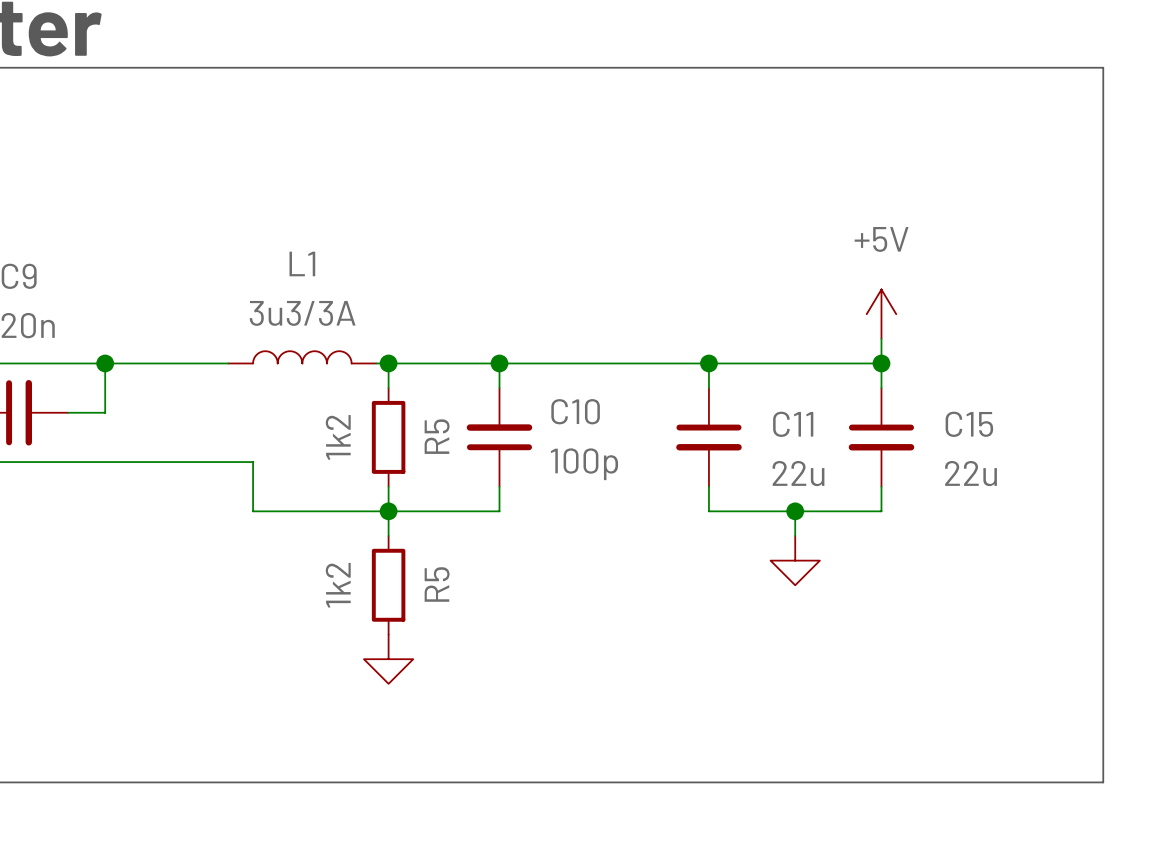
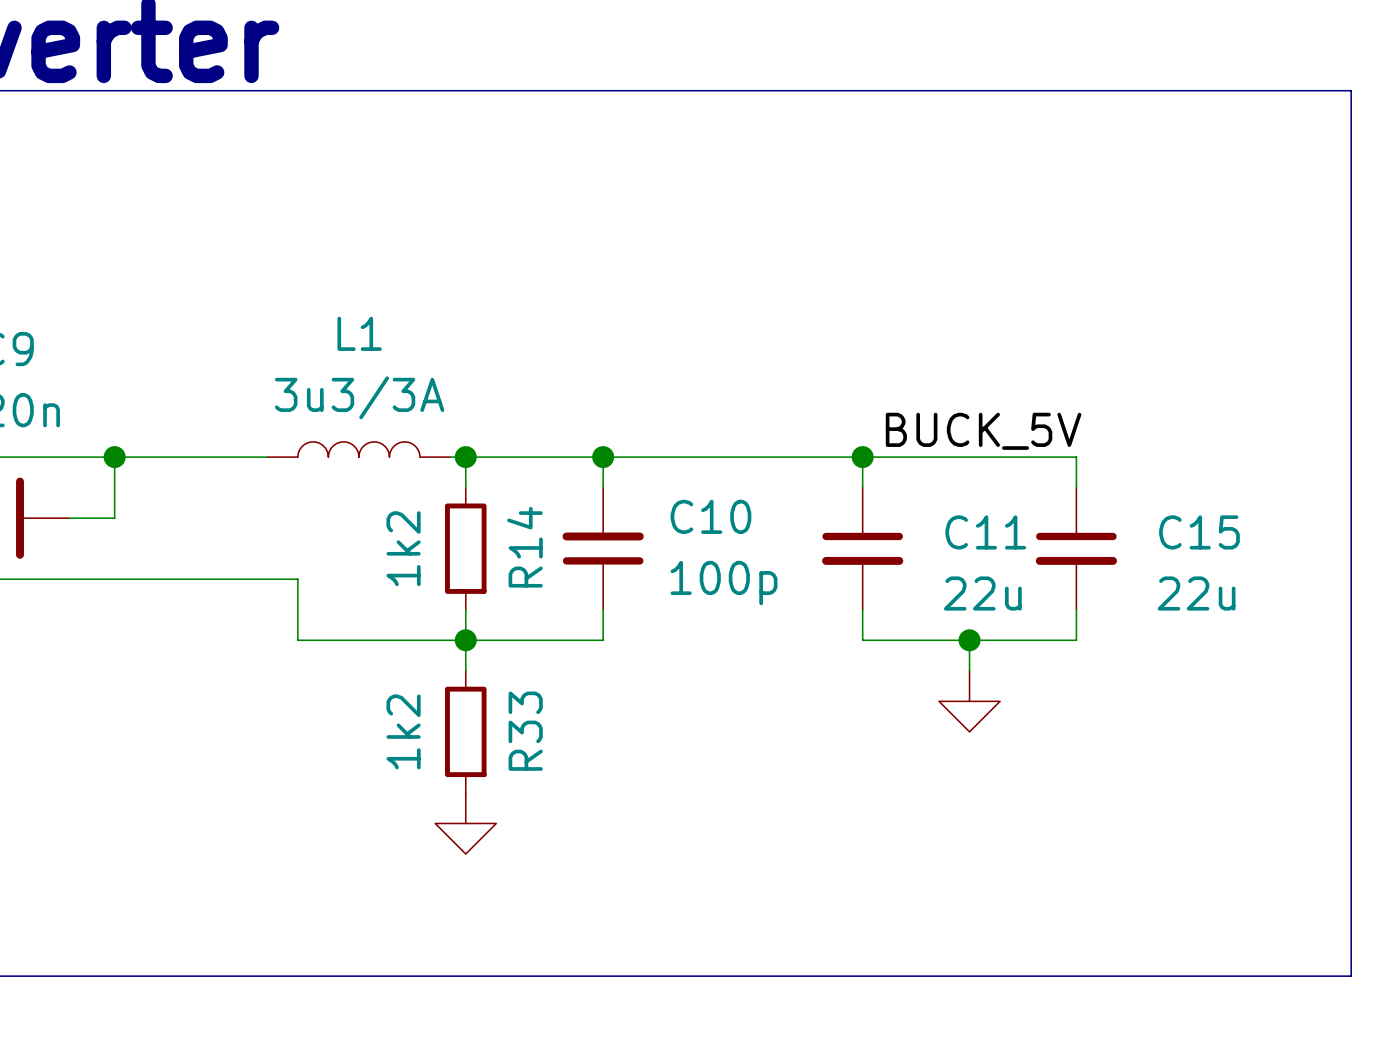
power symbol: +5V (881, 314) -> none
wire: (881, 338) (881, 363) -> none
label: none -> BUCK_5V (983, 431)
junction: (881, 363) -> none
R5 name: R5 (437, 436) -> R14 (524, 547)
R5 name: R5 (437, 584) -> R33 (525, 731)

